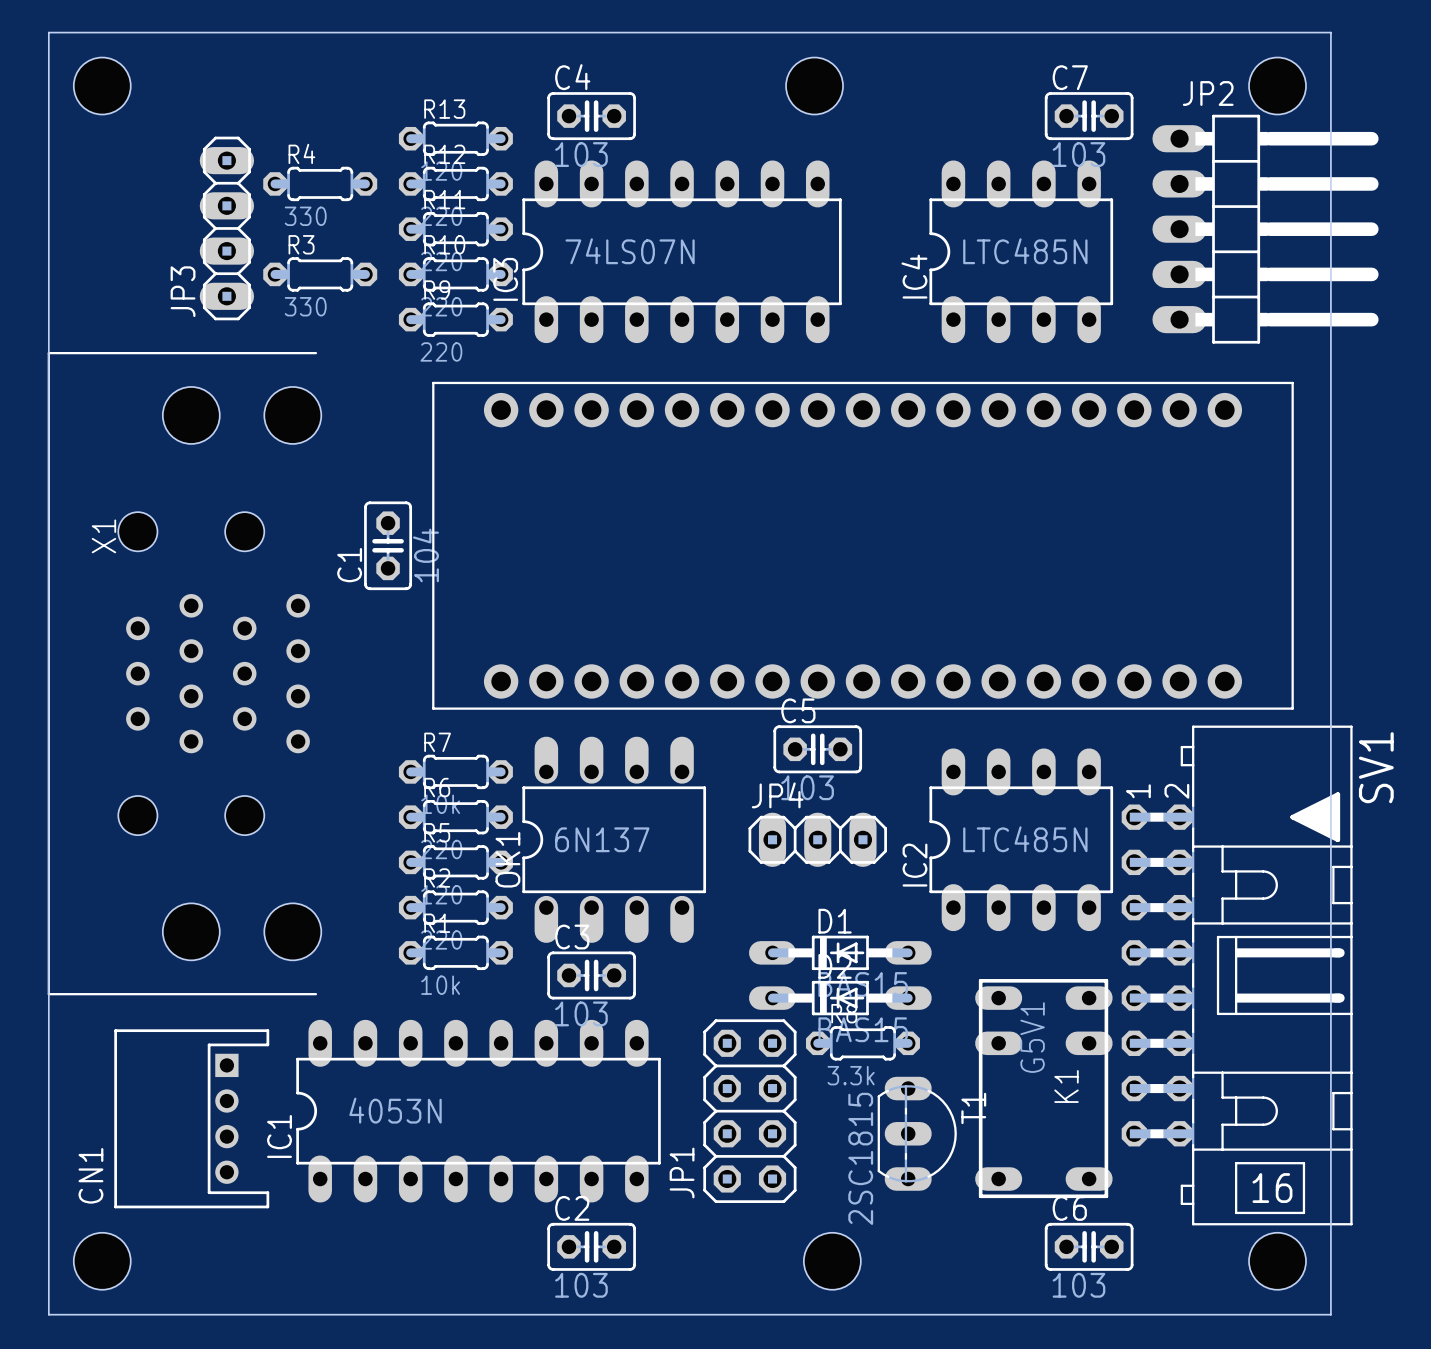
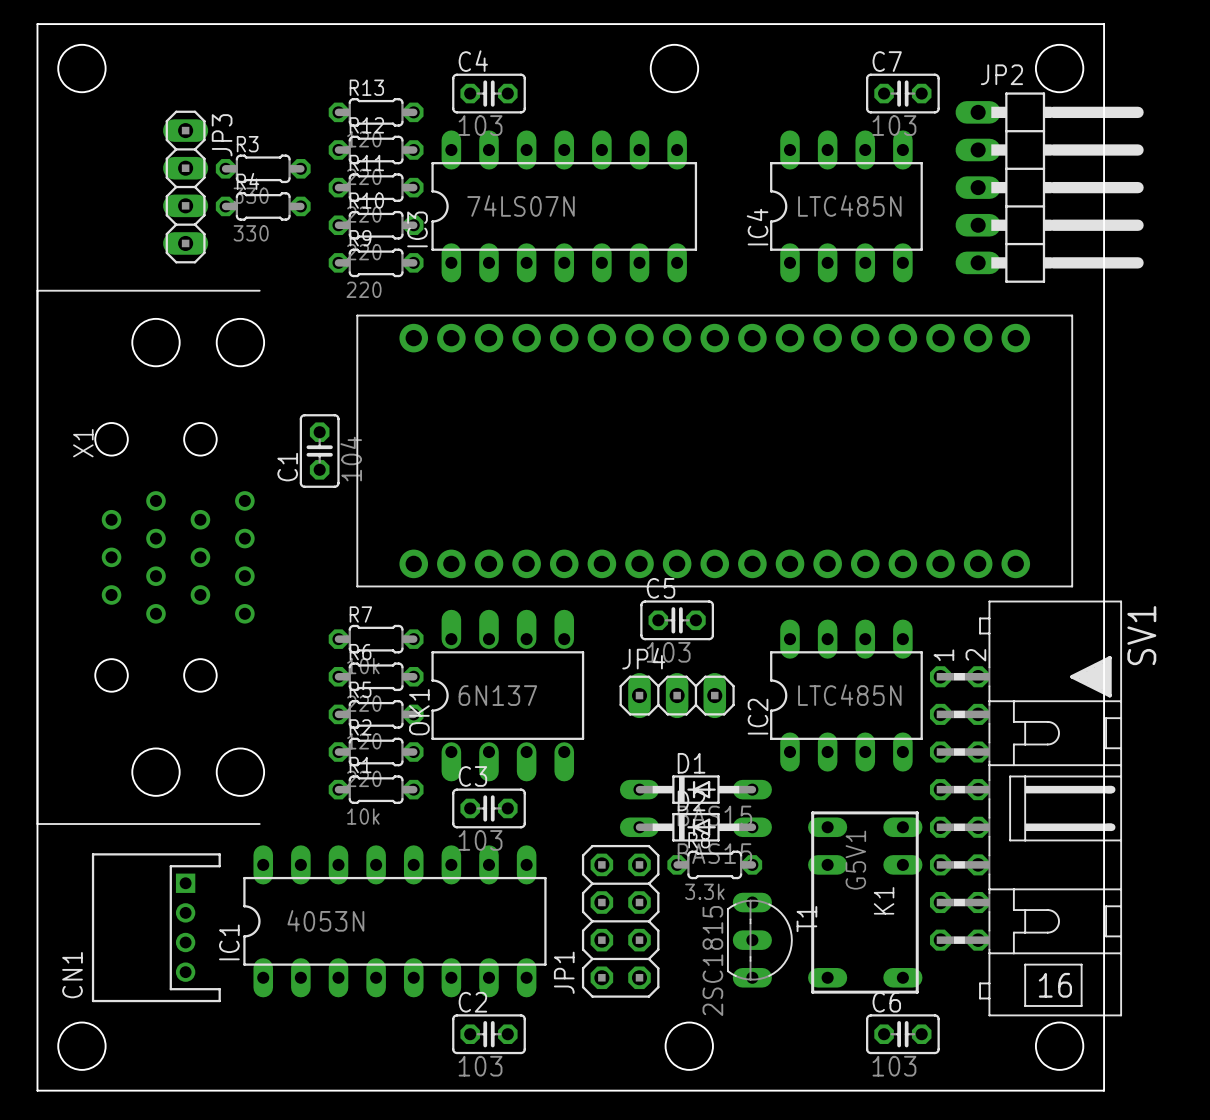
R4 position: (320, 183) -> (263, 206)
R3 position: (320, 274) -> (263, 168)
JP3 name position: JP3 (183, 291) -> JP3 (222, 135)

